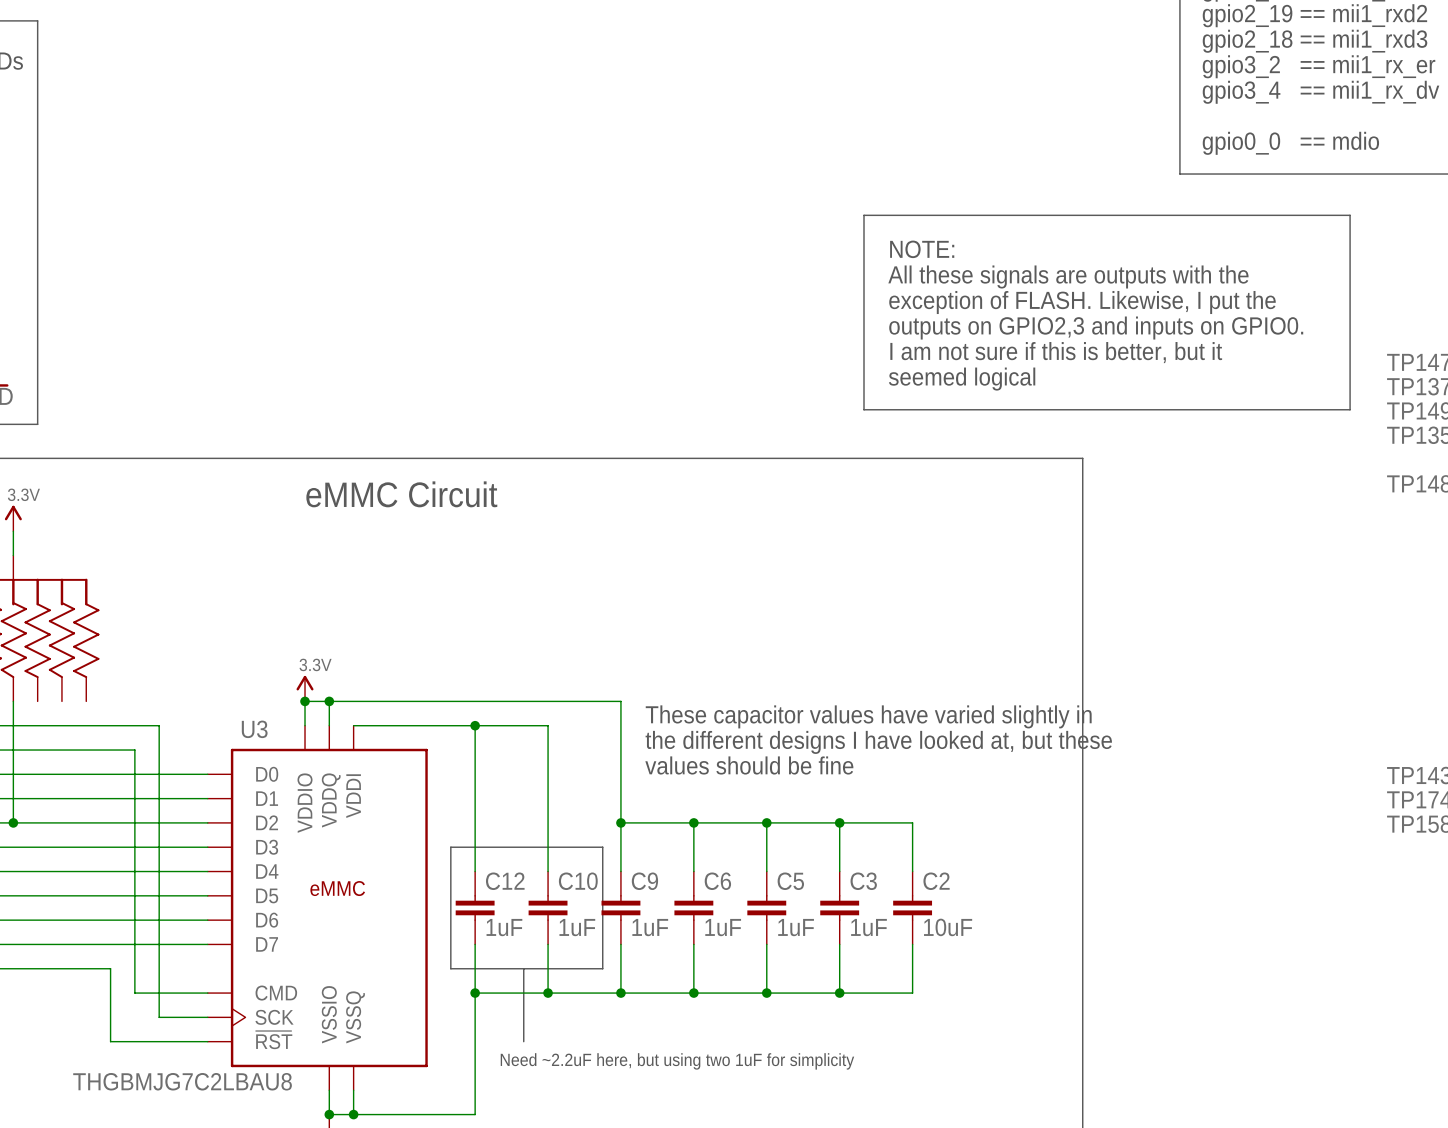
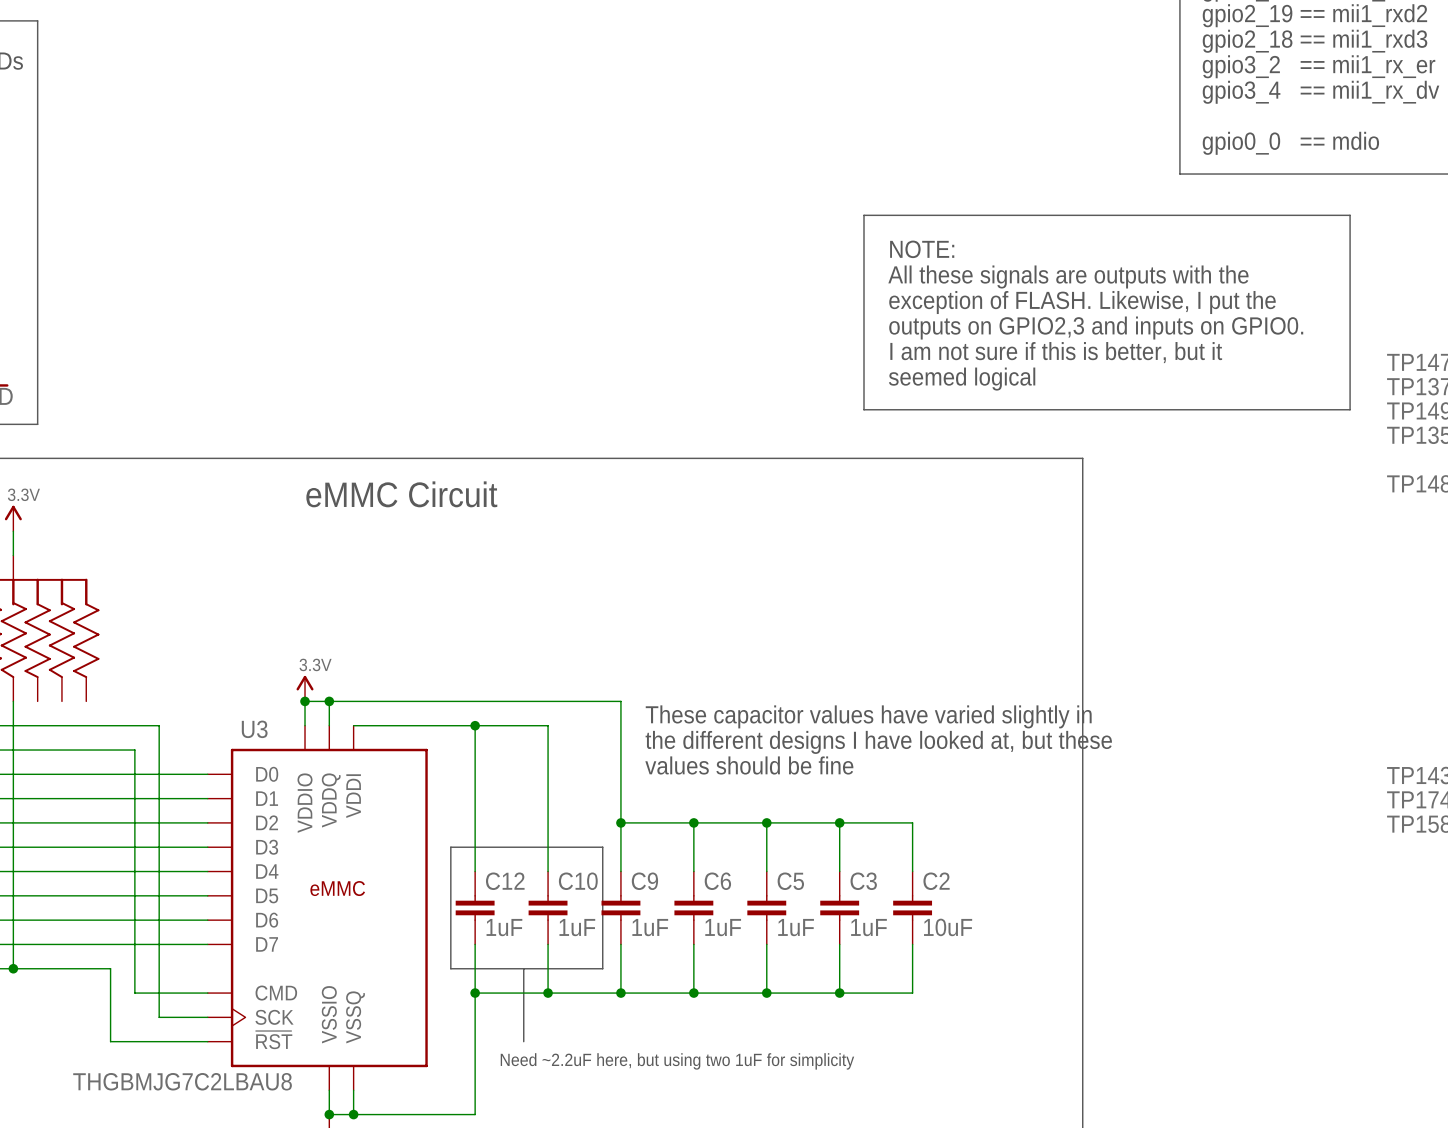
wire: none -> (13, 822) (13, 968)
junction: (13, 822) -> none
junction: none -> (13, 968)

